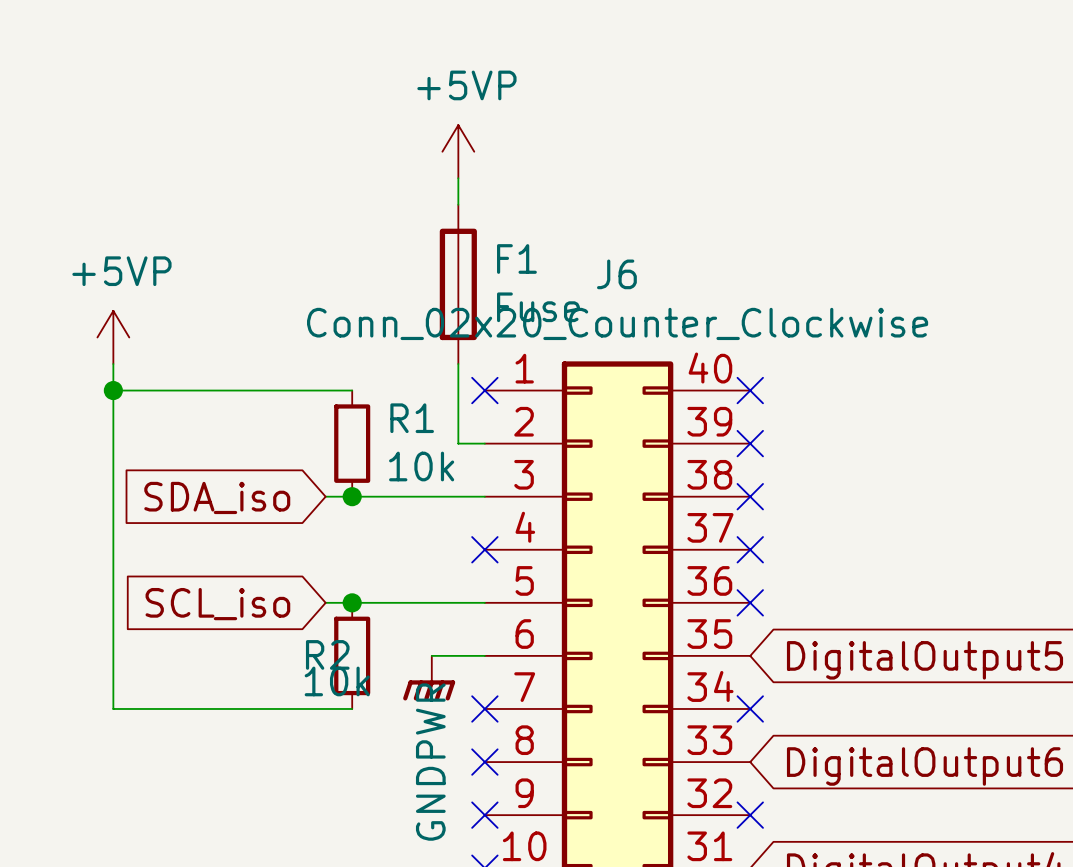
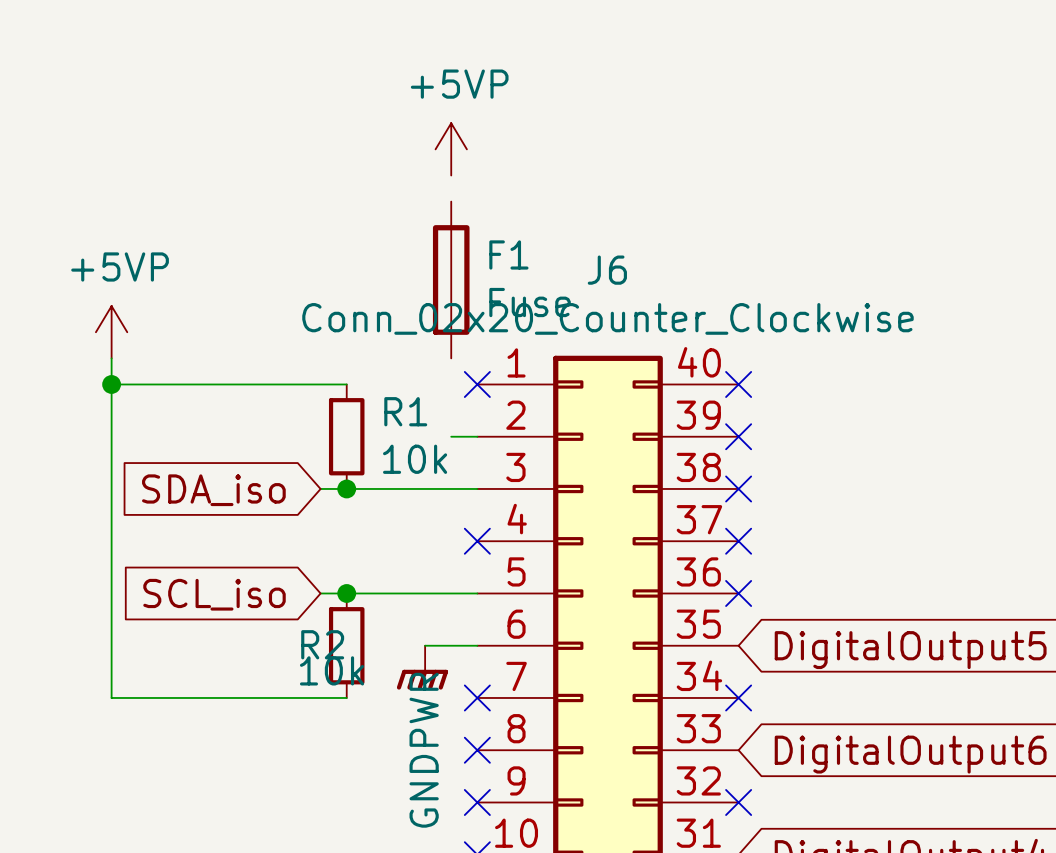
wire: (458, 178) (458, 204) -> none
wire: (458, 364) (458, 443) -> none

